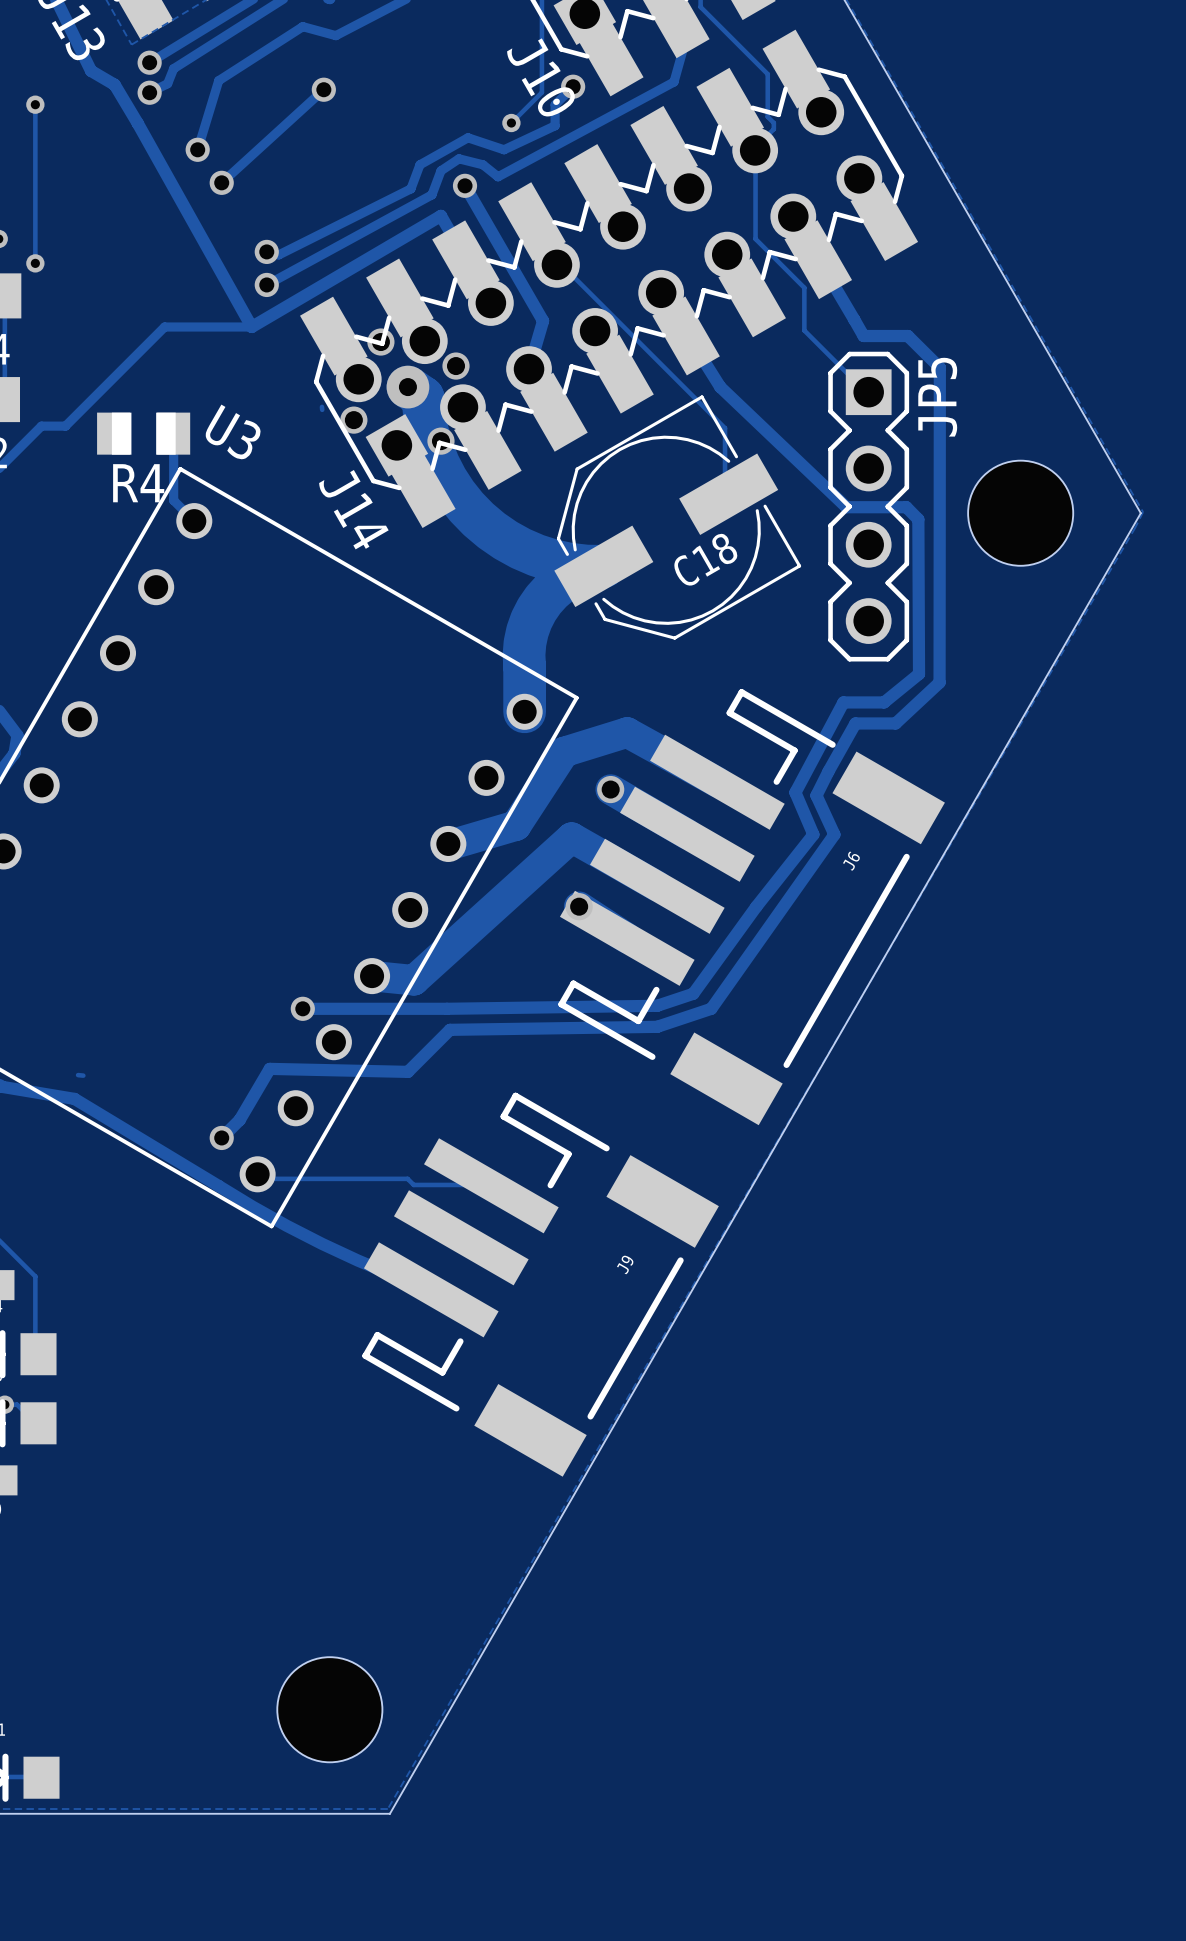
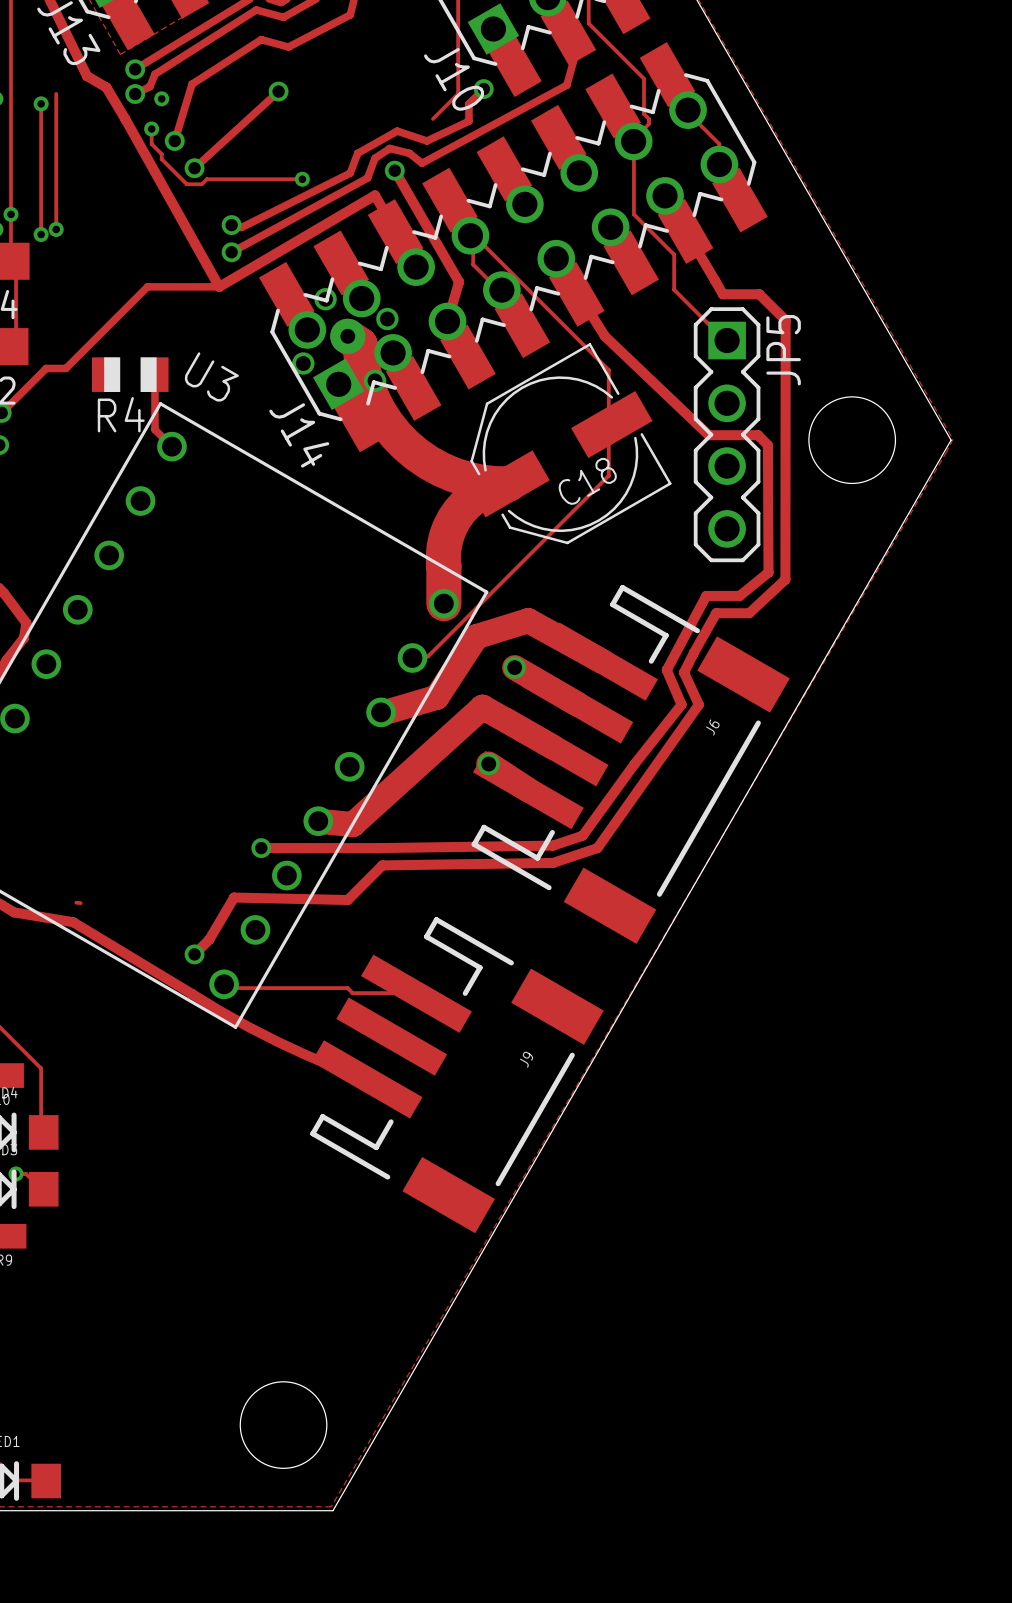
track: none -> (56, 93) (56, 229)
via: none -> (161, 98)
track: none -> (688, 110) (689, 113) (719, 144) (719, 164)
via: (511, 123) -> none
track: none -> (151, 129) (151, 144) (161, 154) (161, 159) (186, 184) (201, 184) (206, 179) (302, 179)
via: none -> (151, 129)
via: none -> (302, 179)
via: none -> (56, 229)
track: none -> (470, 235) (473, 239) (473, 264) (498, 289) (501, 290)
track: (321, 406) (322, 409) -> none
track: none -> (611, 424) (608, 425) (608, 475) (427, 656) (412, 658)

